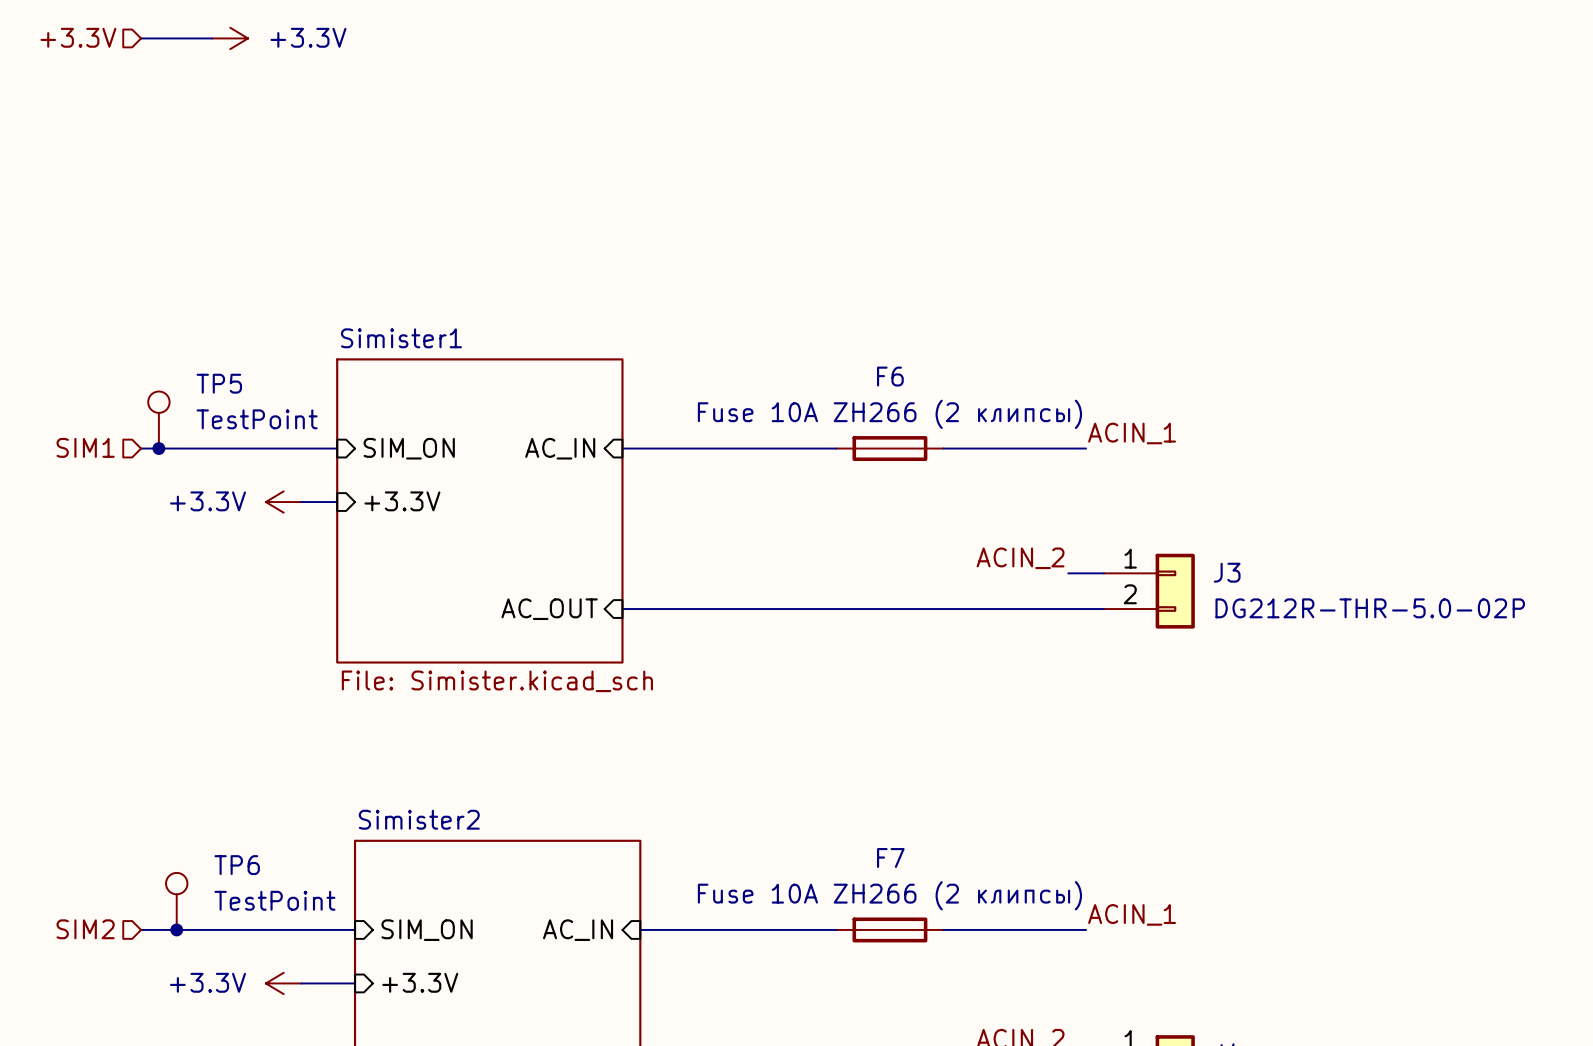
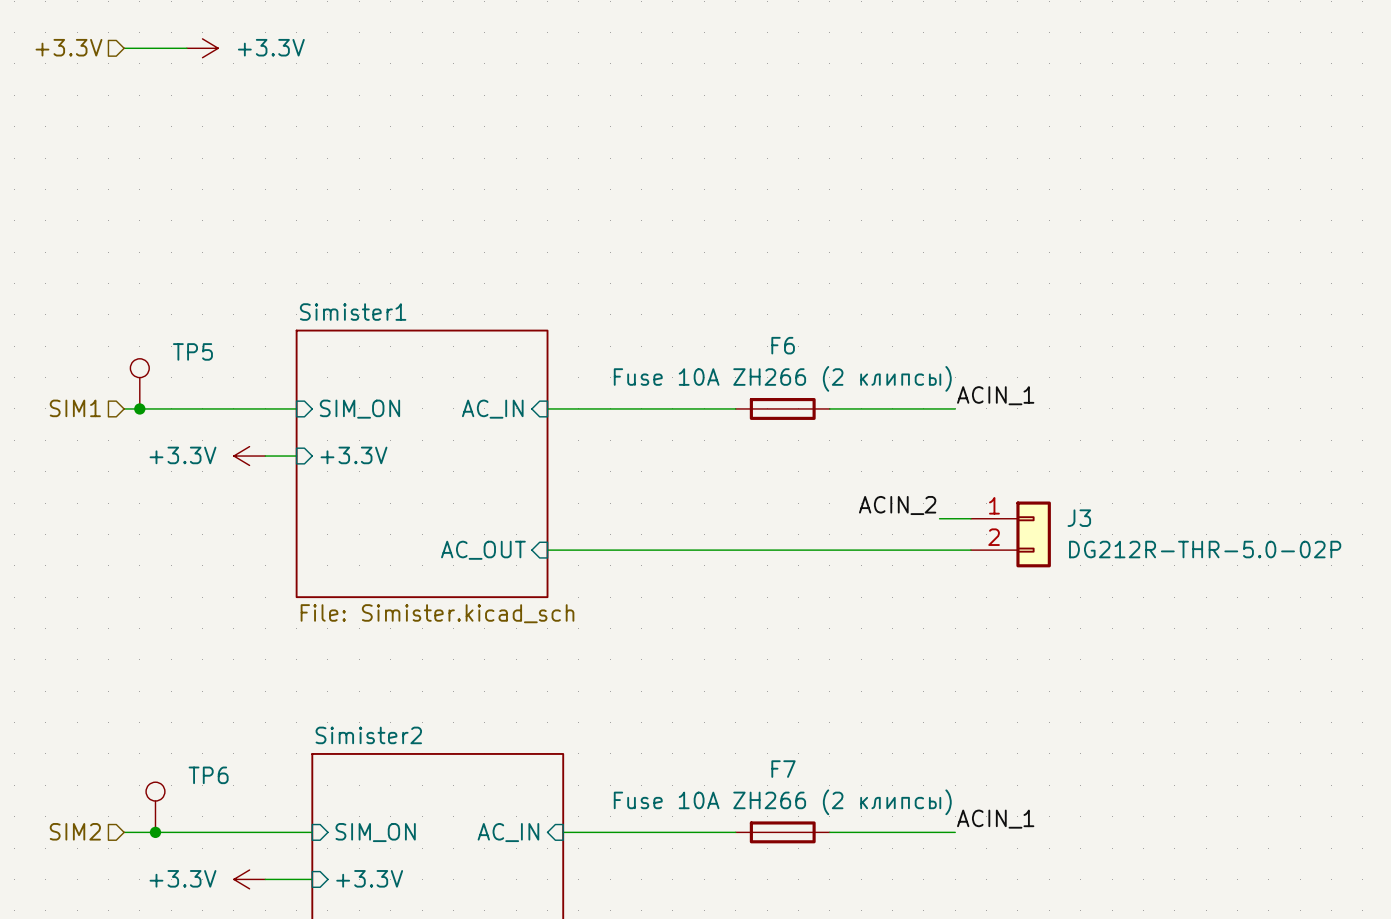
TP5 value: TestPoint (257, 419) -> none
TP6 value: TestPoint (274, 900) -> none

